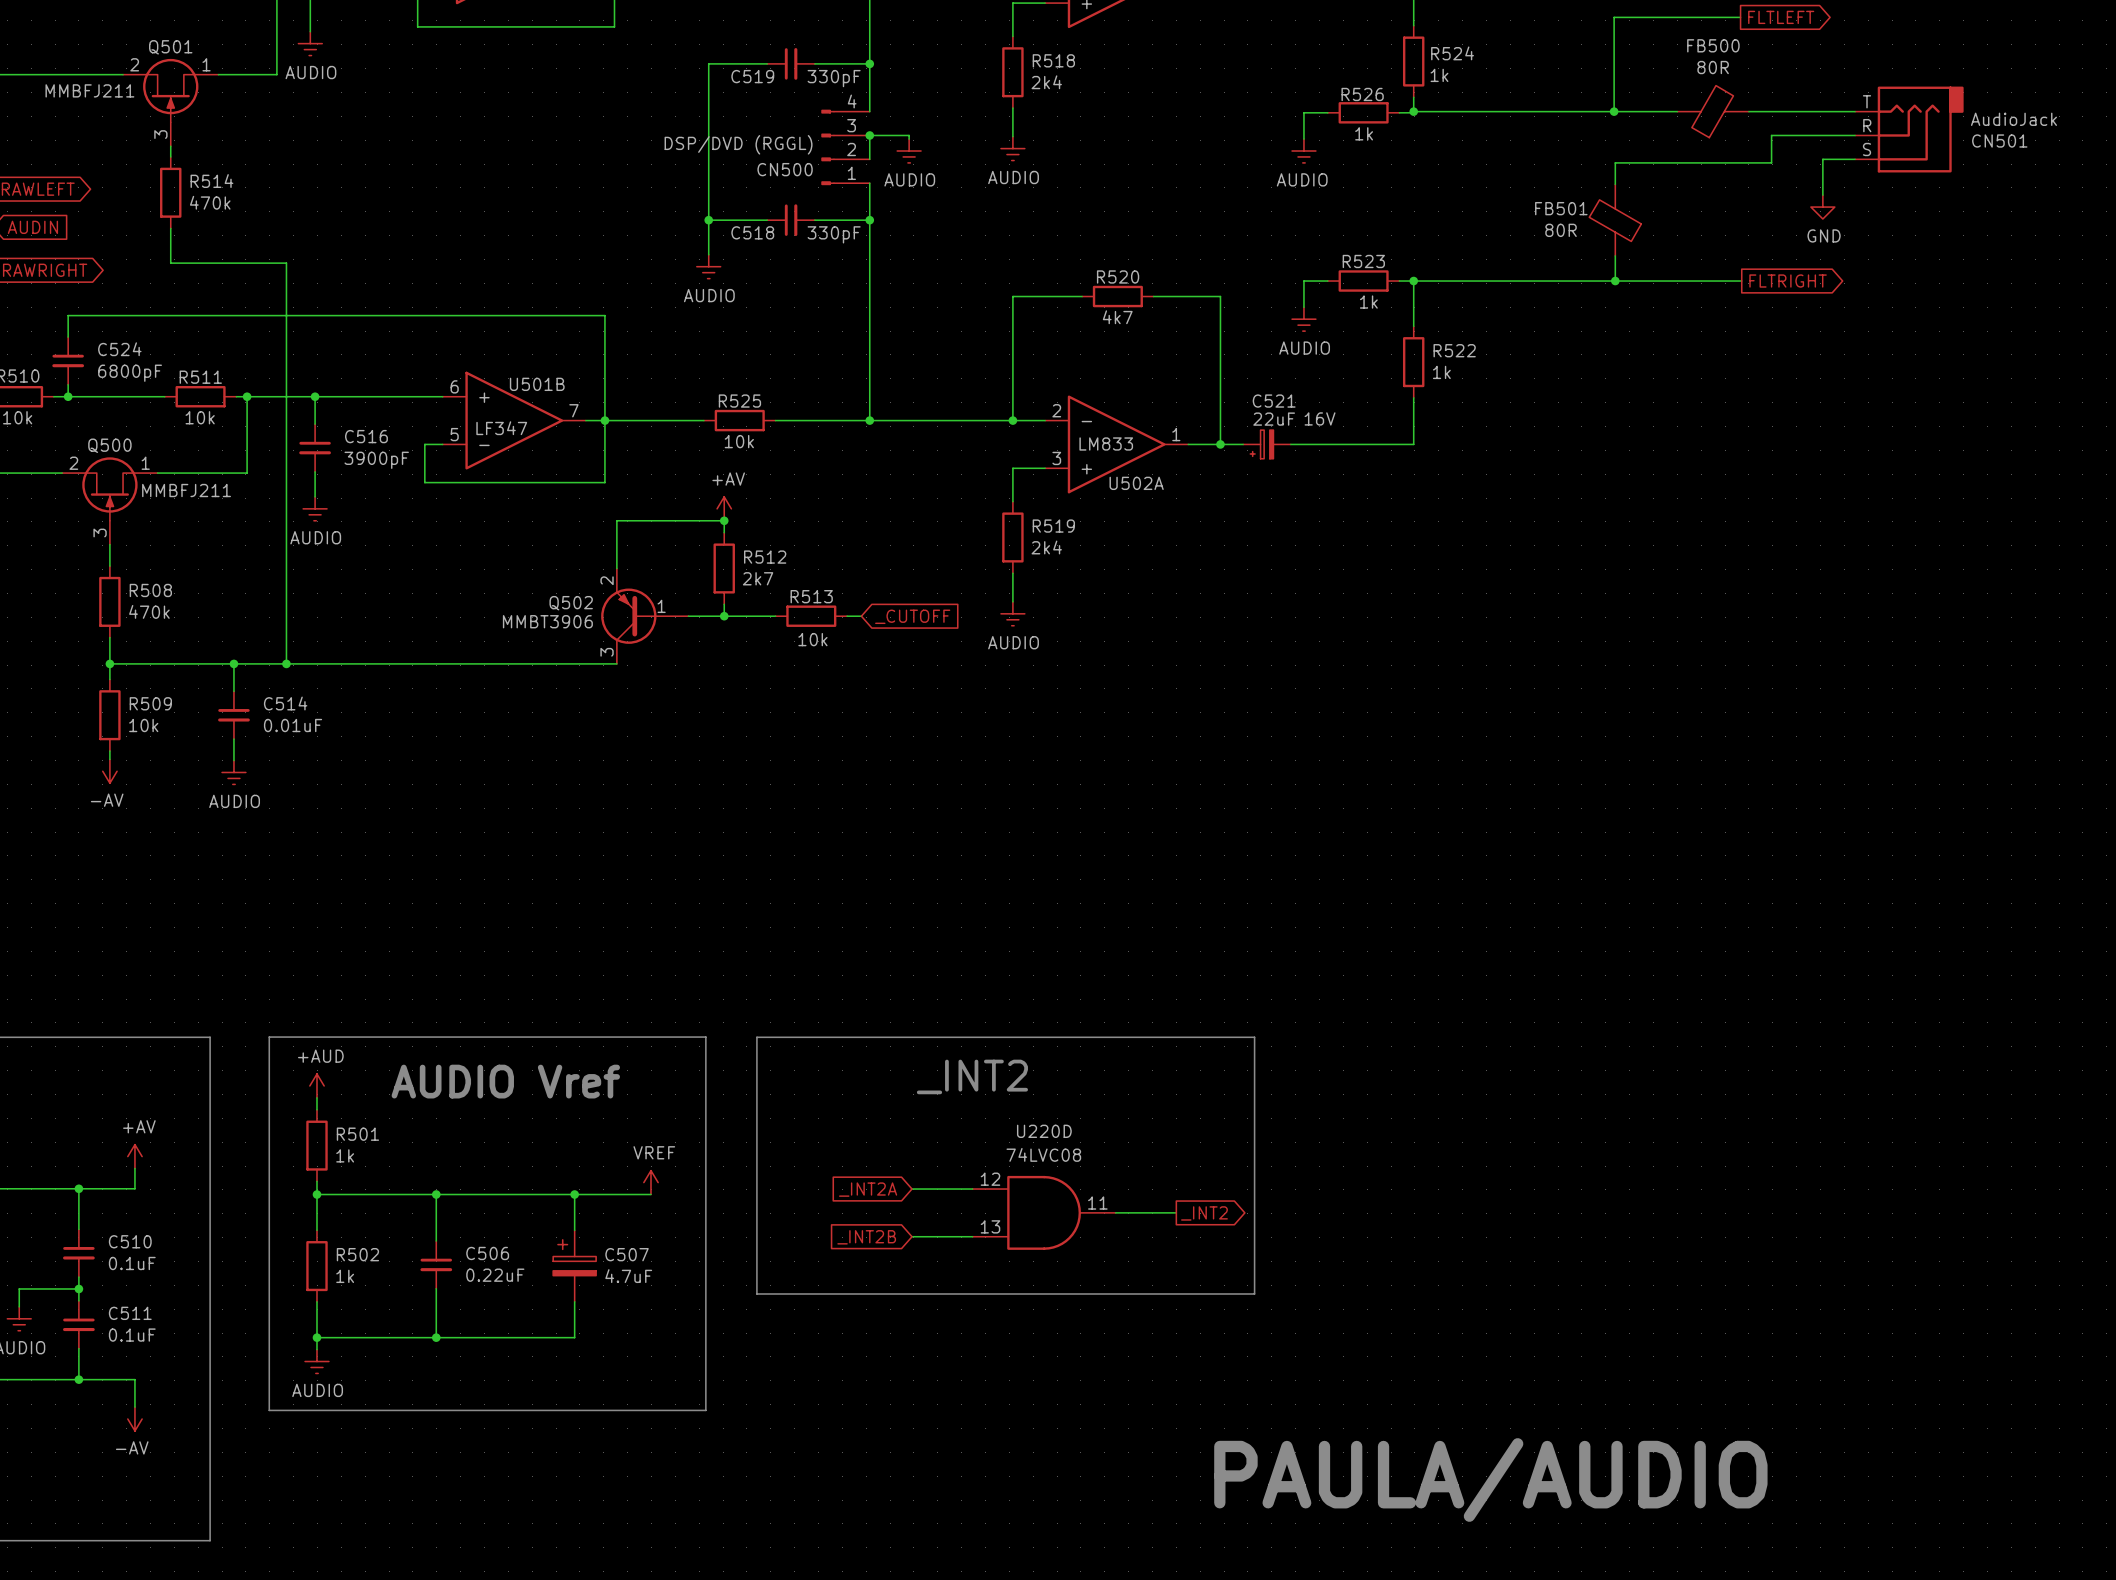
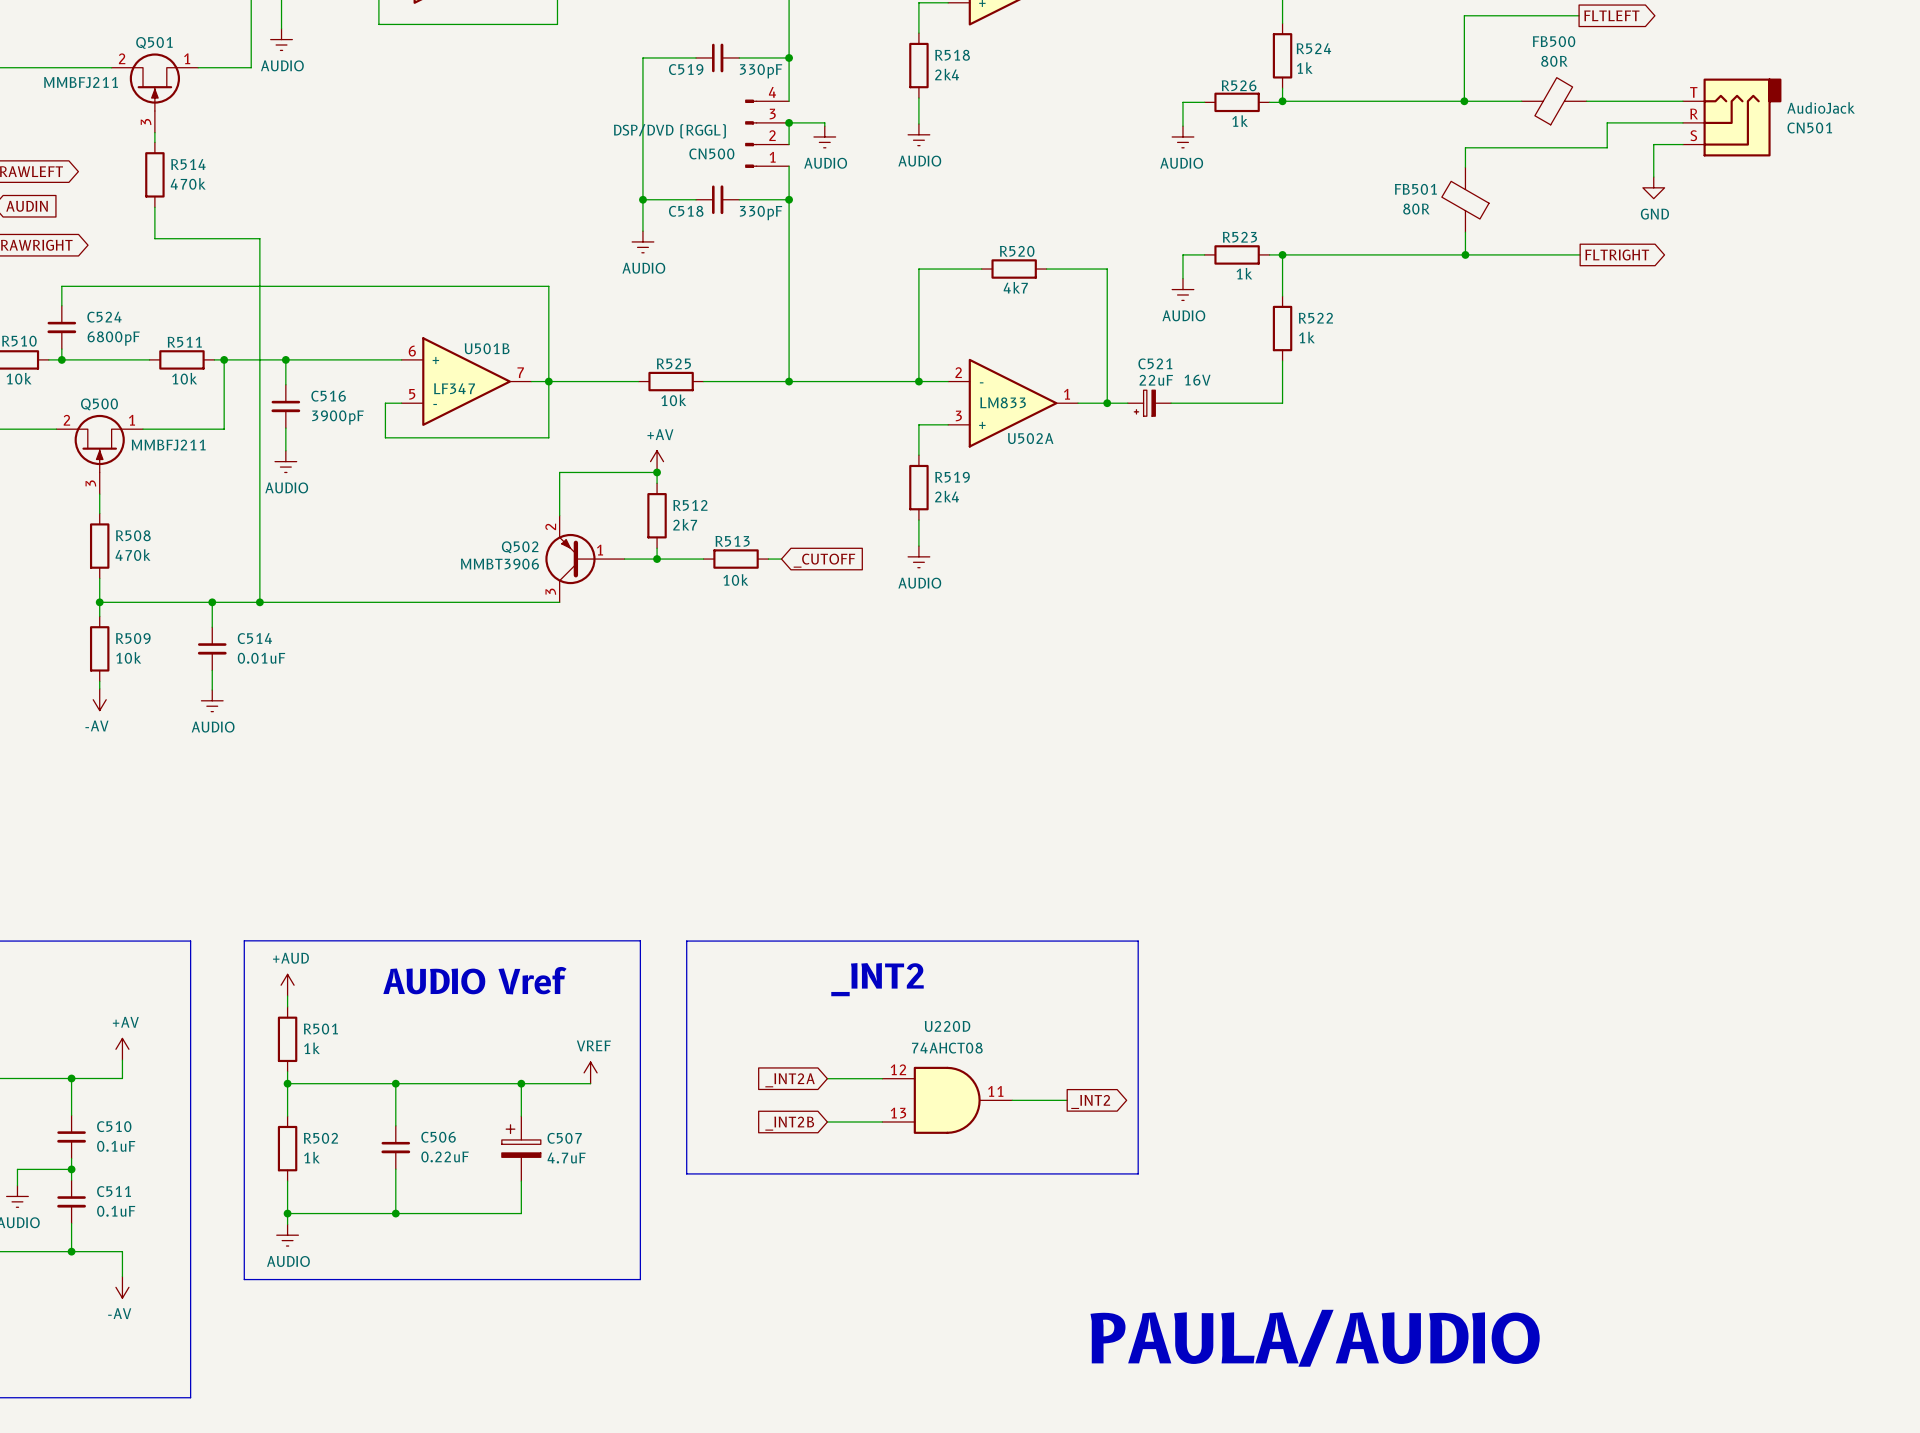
U220D value: 74LVC08 (1043, 1154) -> 74AHCT08 (947, 1048)

